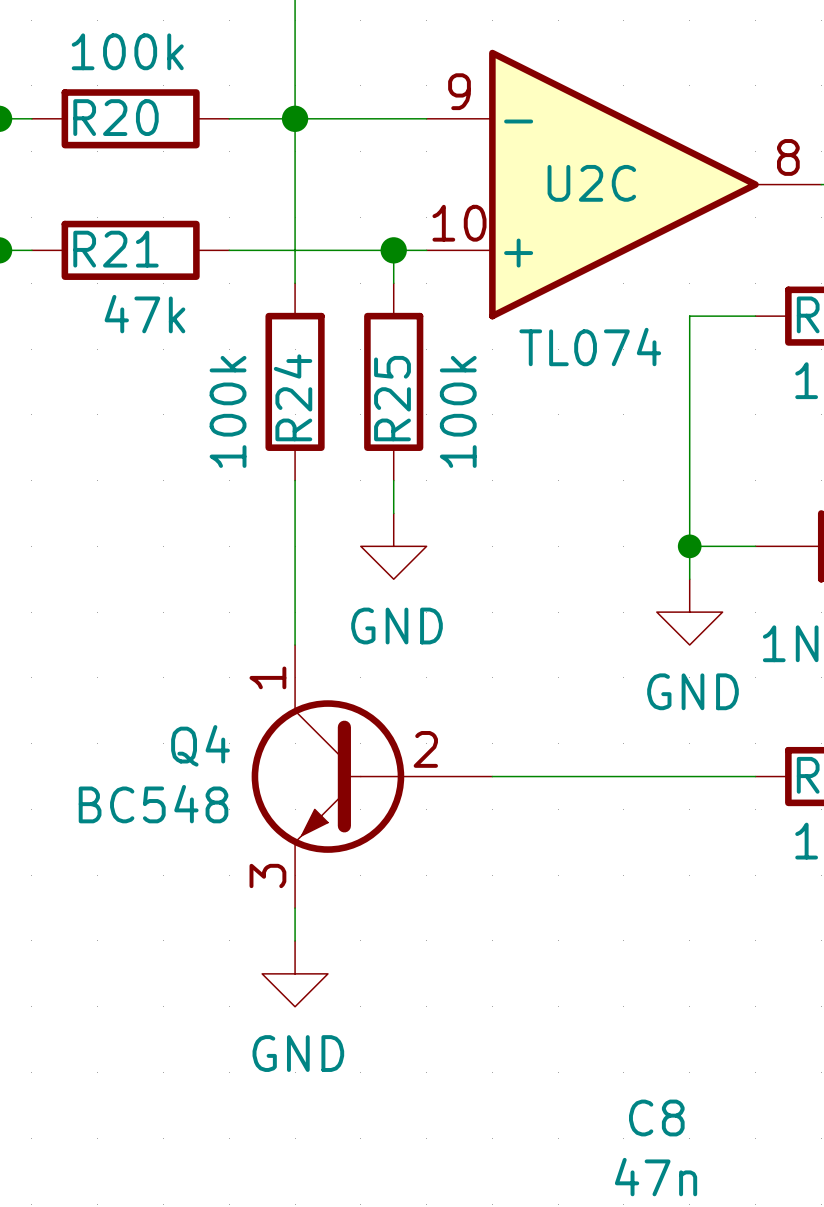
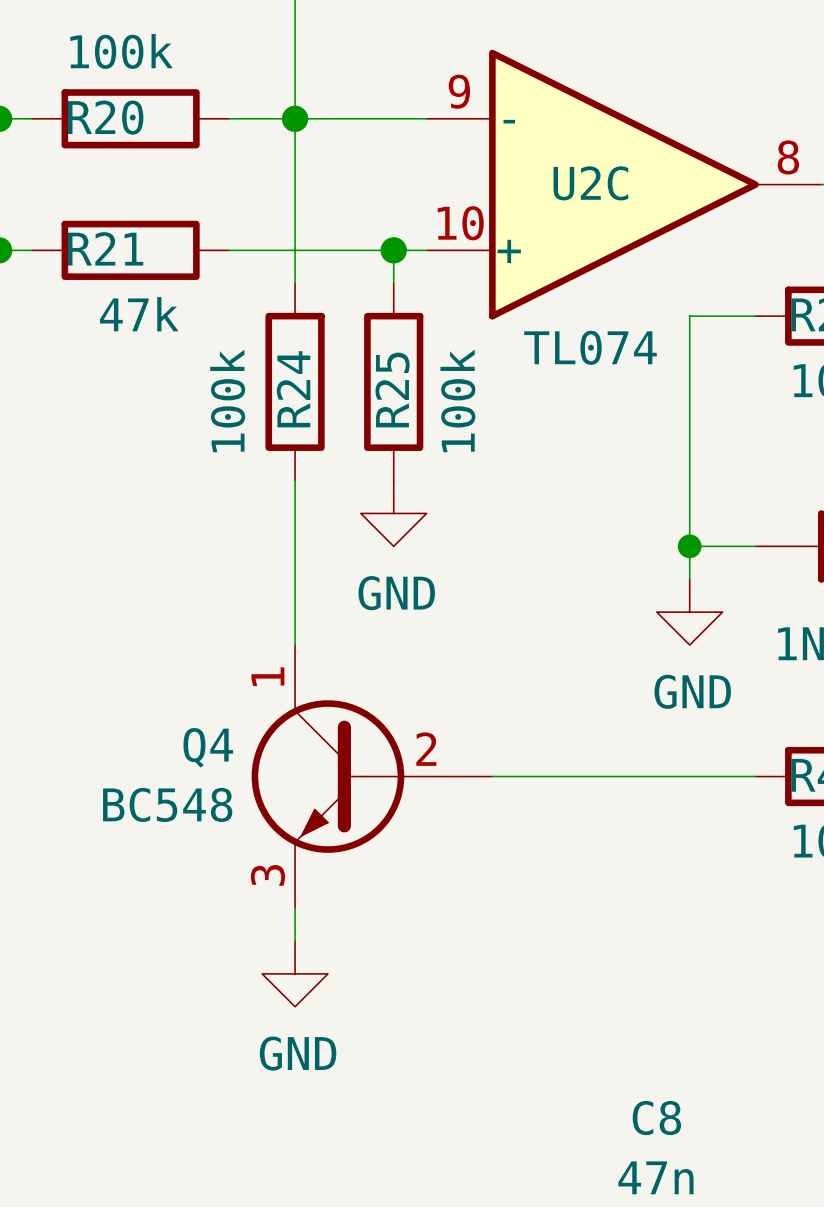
power symbol position: GND (393, 546) -> GND (393, 513)

